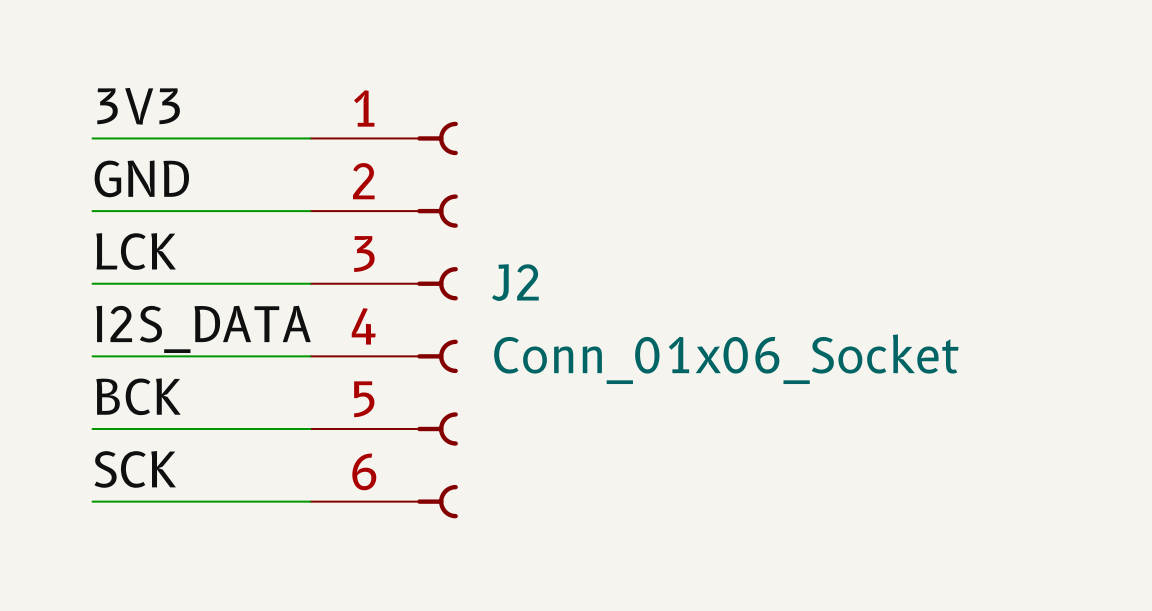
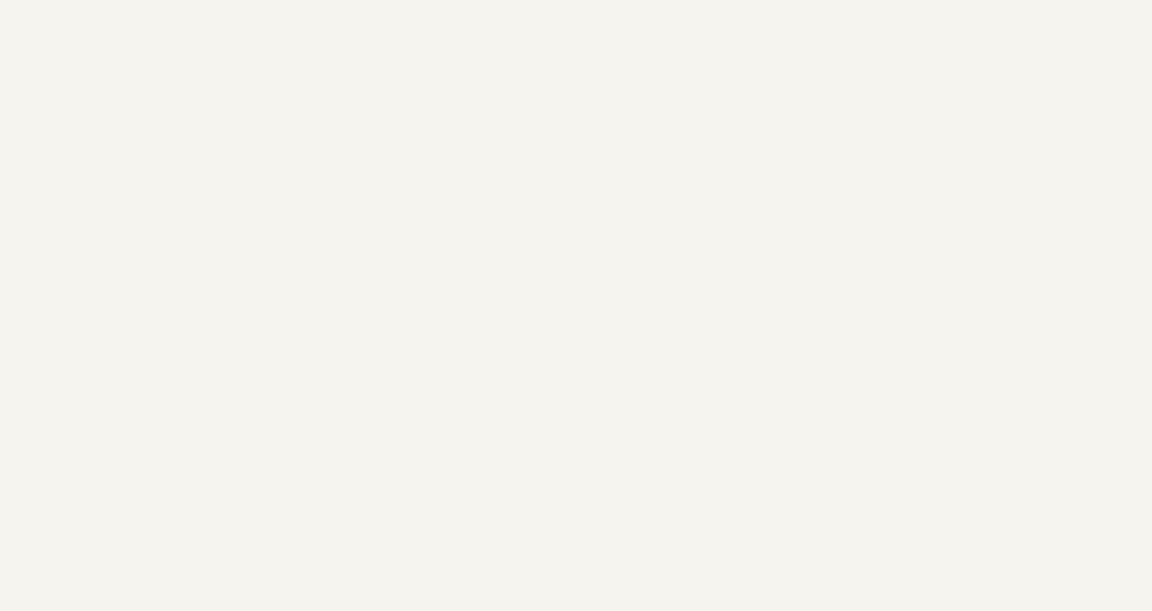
label: 3V3 (138, 106) -> none
wire: (92, 138) (310, 138) -> none
label: GND (141, 178) -> none
wire: (92, 211) (310, 211) -> none
label: LCK (136, 251) -> none
wire: (92, 283) (310, 283) -> none
J2: Conn_01x06_Socket (384, 320) -> none
label: I2S_DATA (203, 329) -> none
wire: (92, 356) (310, 356) -> none
label: BCK (138, 396) -> none
wire: (92, 428) (310, 428) -> none
label: SCK (135, 469) -> none
wire: (92, 501) (310, 501) -> none

